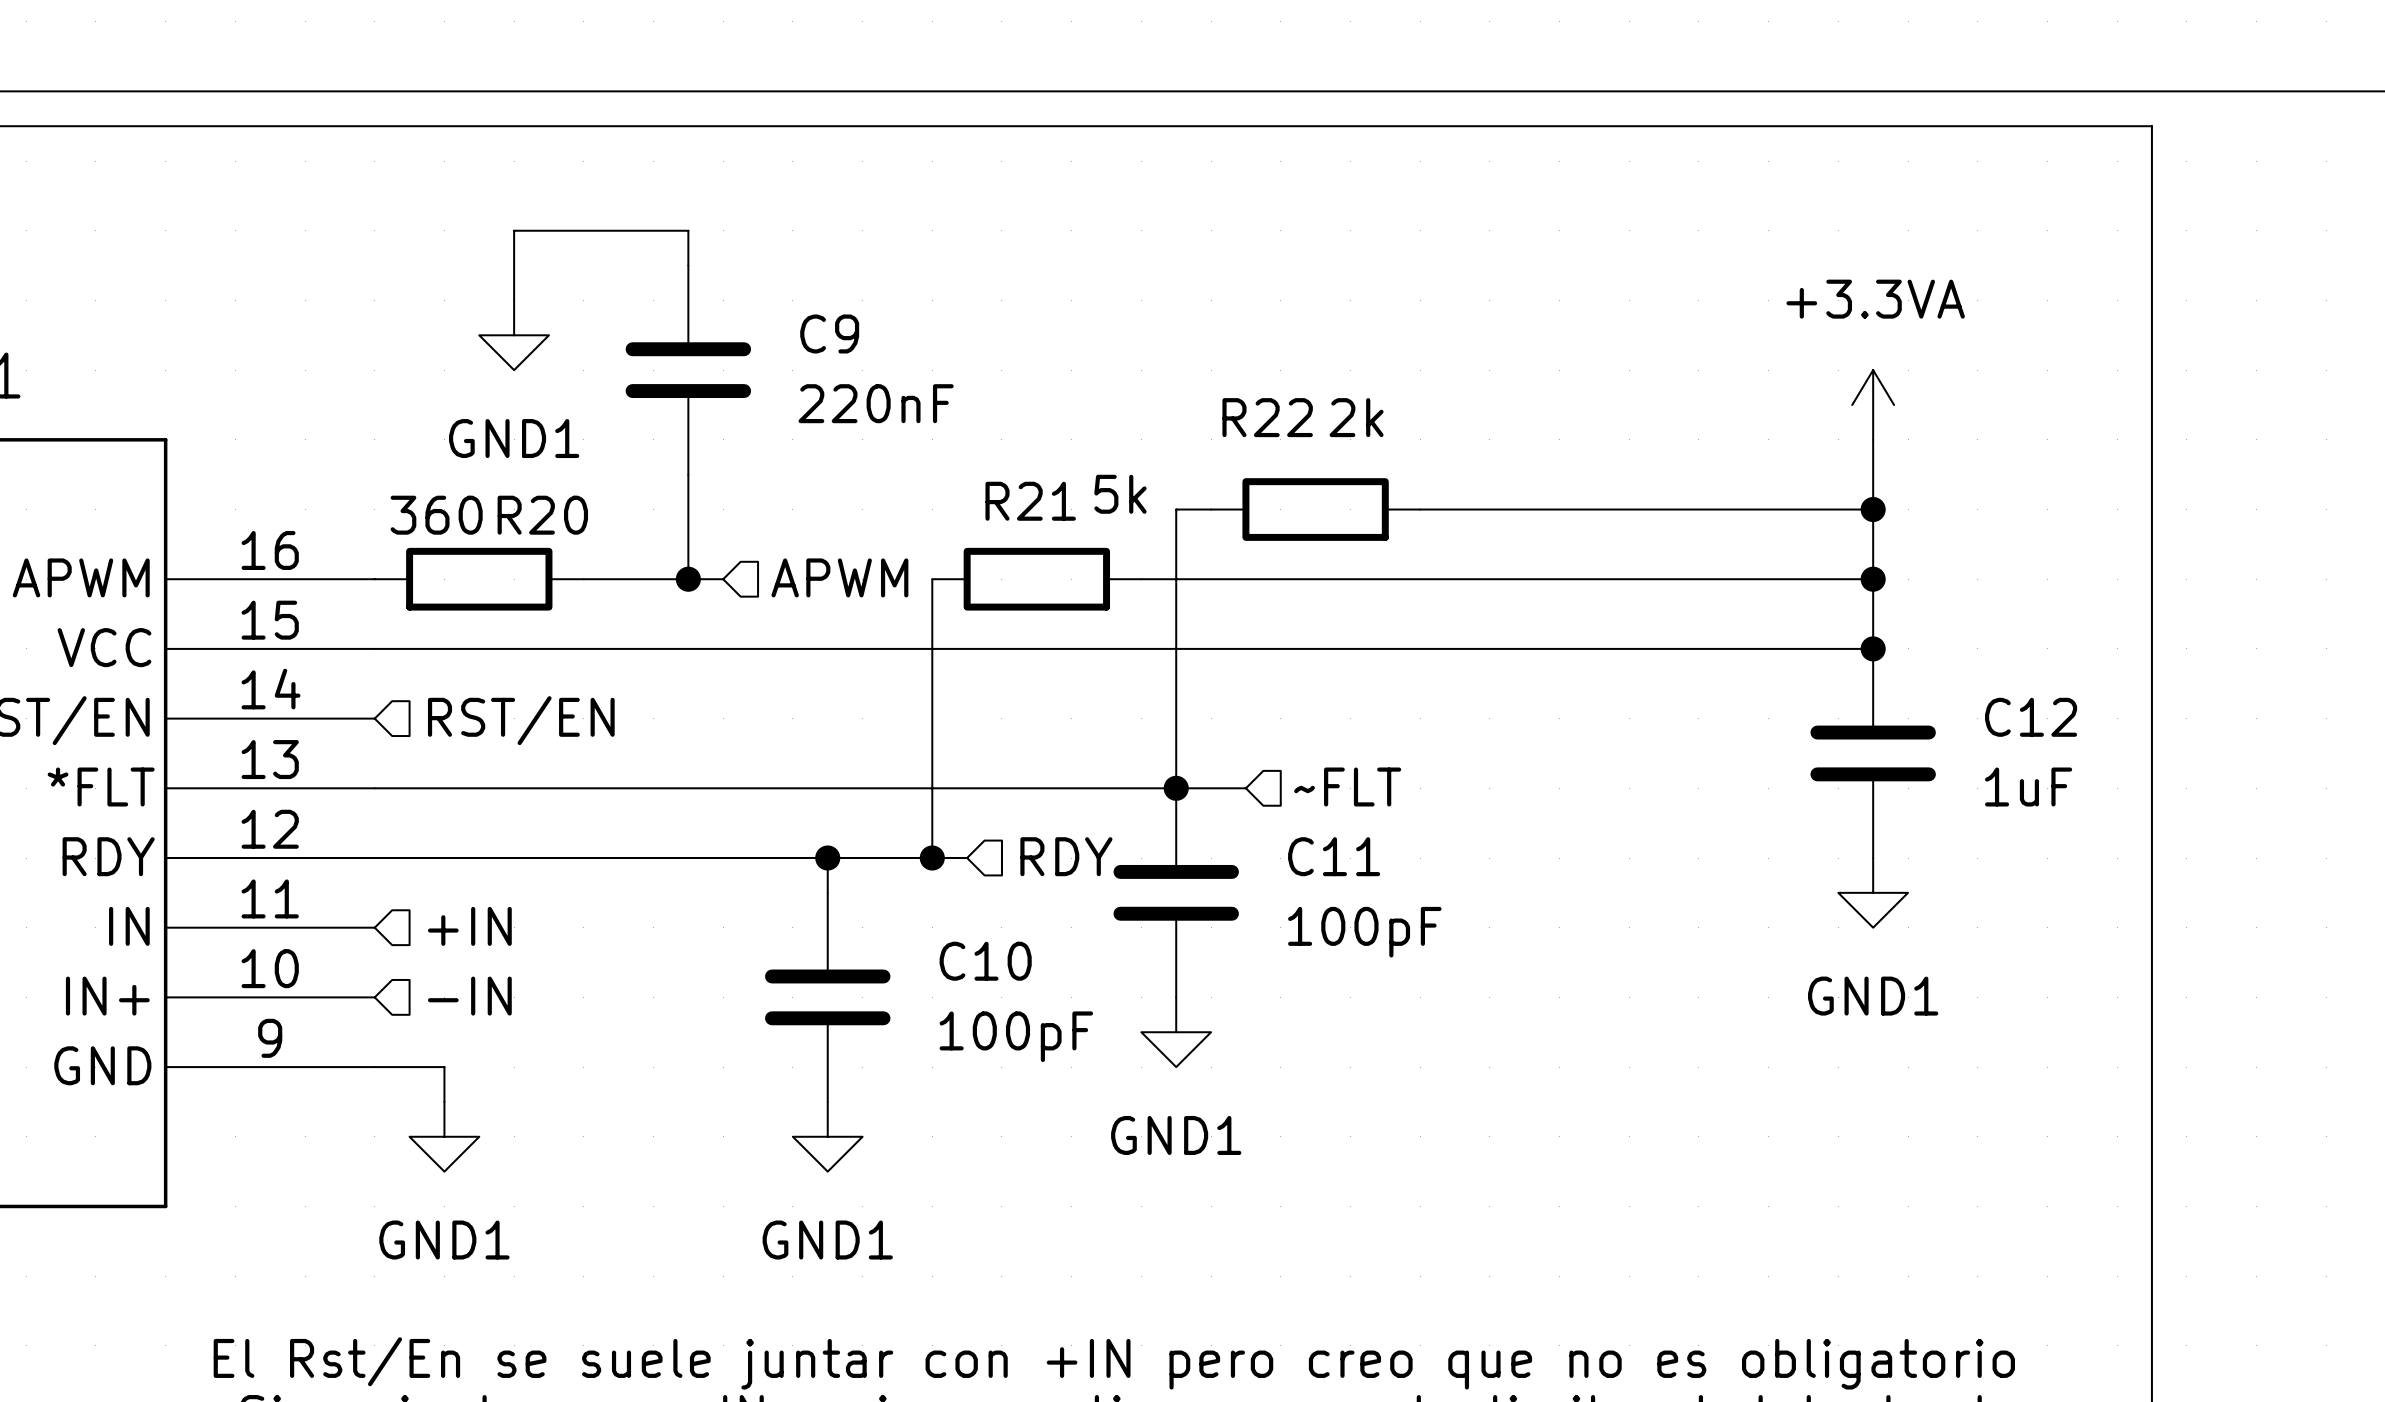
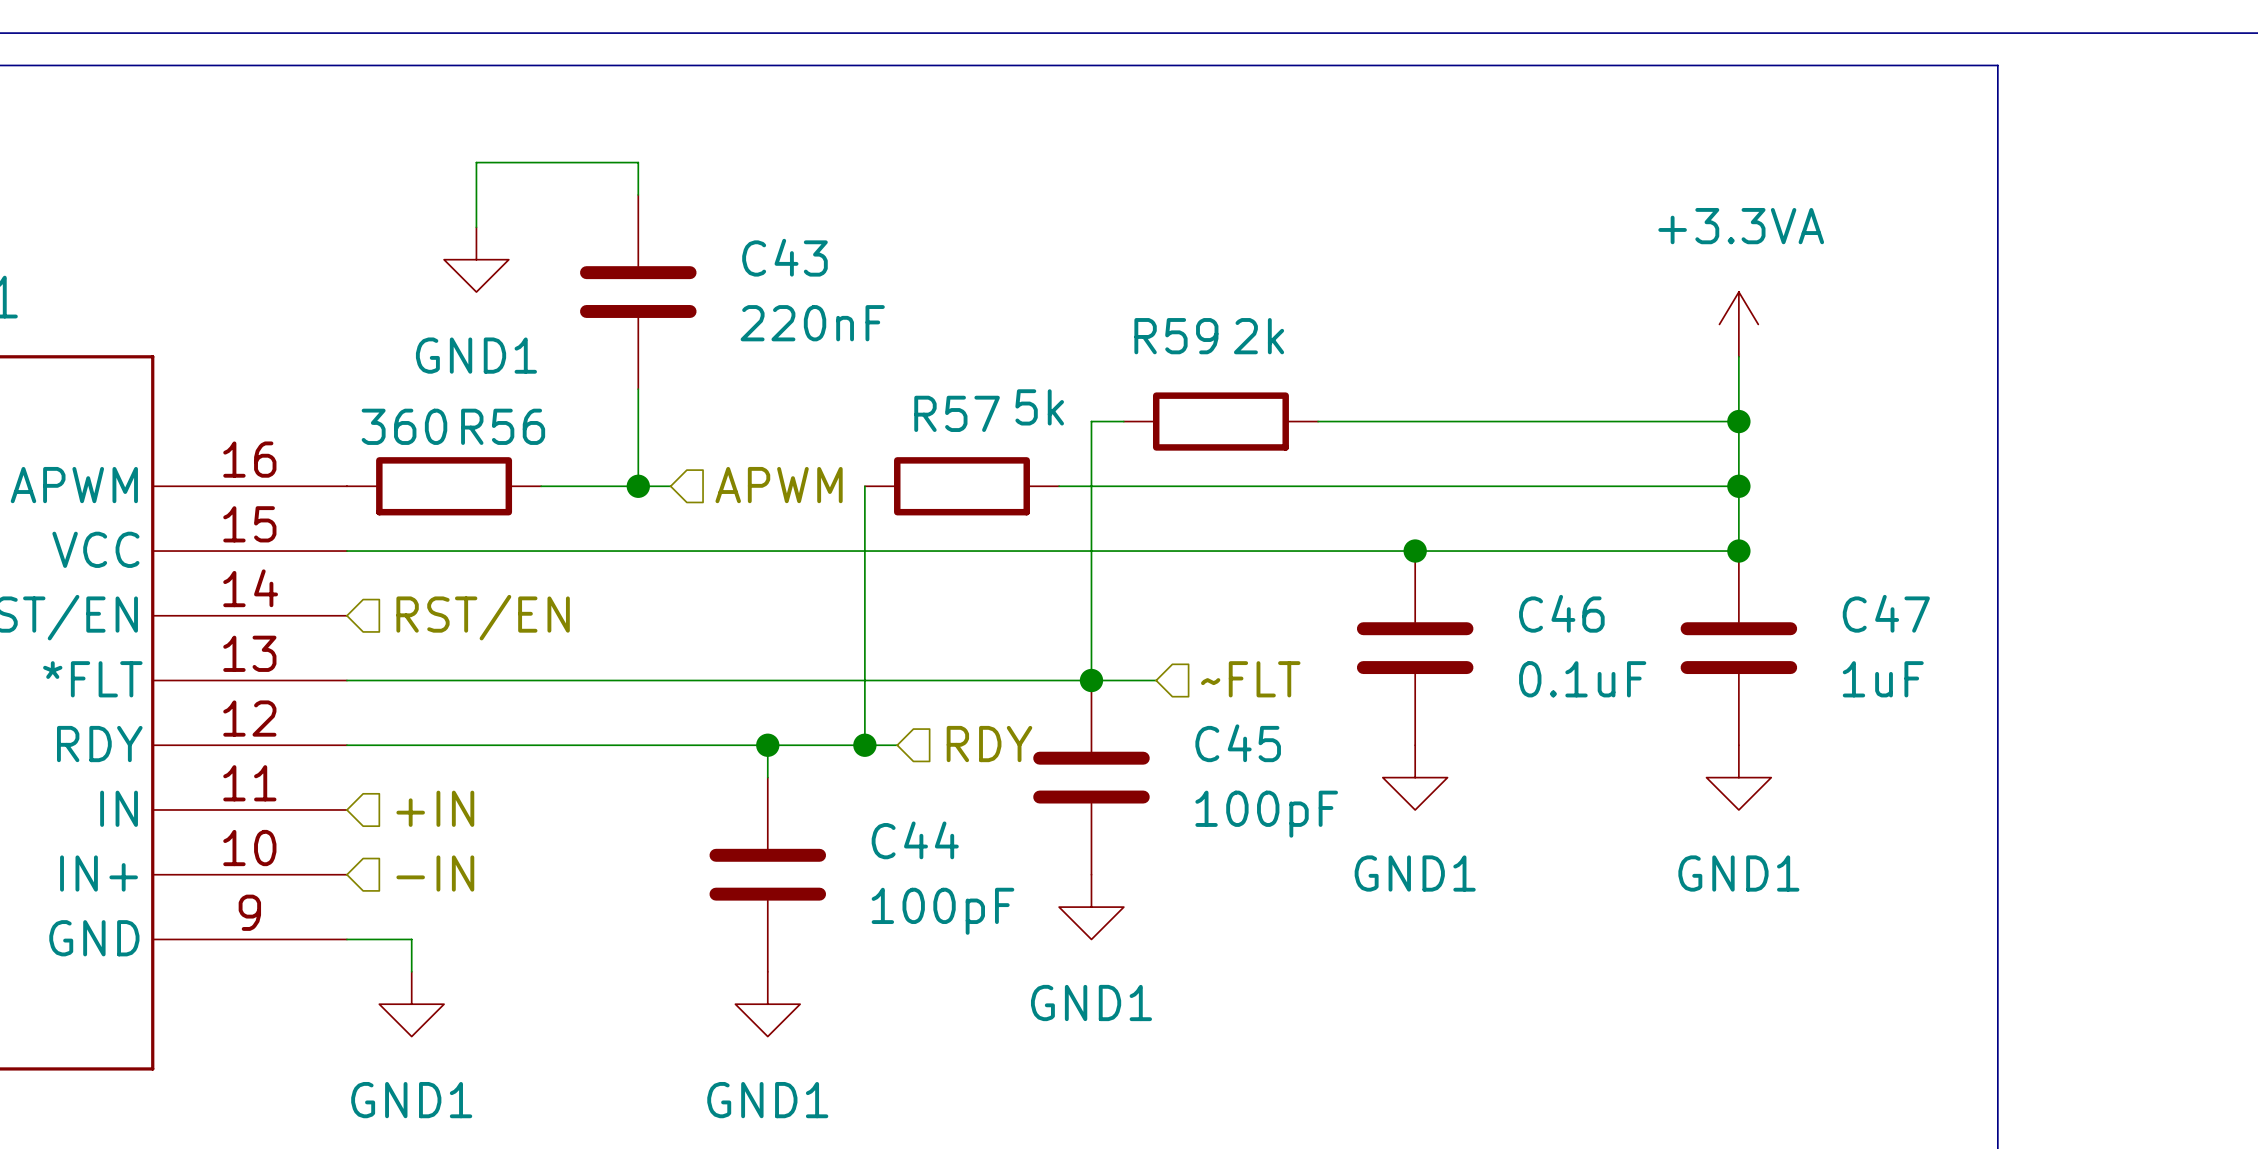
C9 name: C9 (829, 333) -> C43 (784, 257)
R22 name: R22 (1267, 417) -> R59 (1176, 336)
R21 name: R21 (1030, 501) -> R57 (957, 413)
R20 name: R20 (542, 515) -> R56 (503, 426)
junction: none -> (1415, 551)
C12 name: C12 (2031, 717) -> C47 (1886, 613)
C46: none -> 0.1uF (1415, 648)
C11 name: C11 (1334, 856) -> C45 (1238, 743)
power symbol: none -> GND1 (1415, 777)
C10 name: C10 (985, 961) -> C44 (915, 840)

